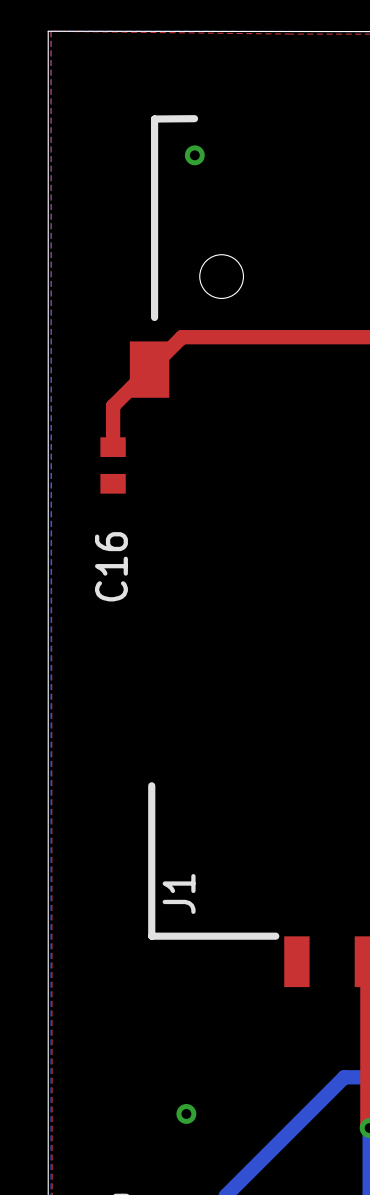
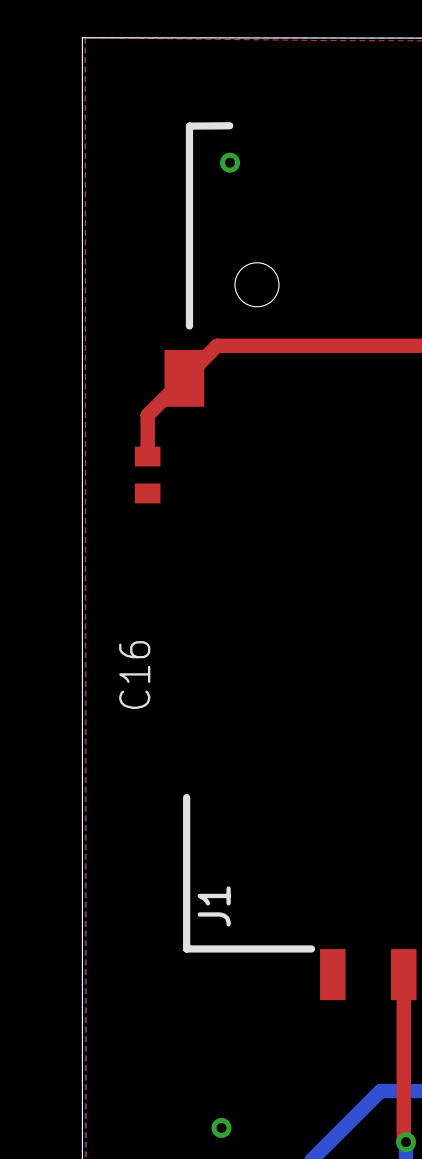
C16 name position: C16 (111, 566) -> C16 (134, 675)

